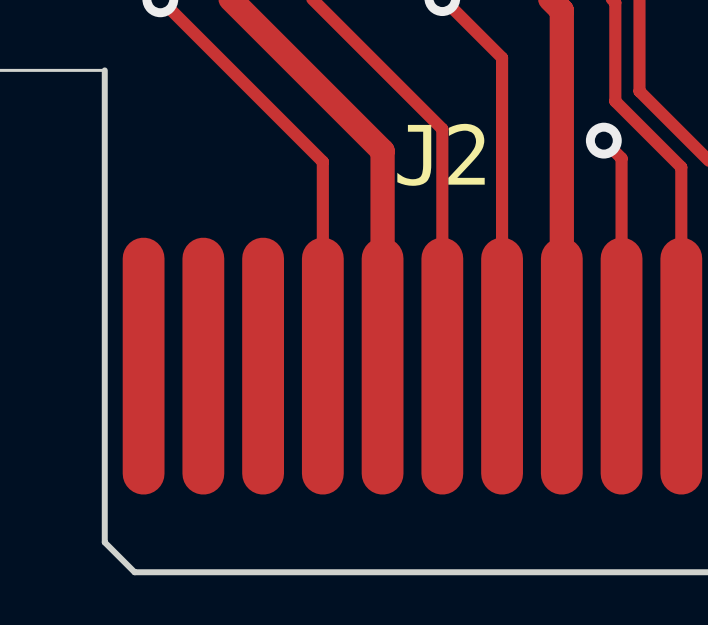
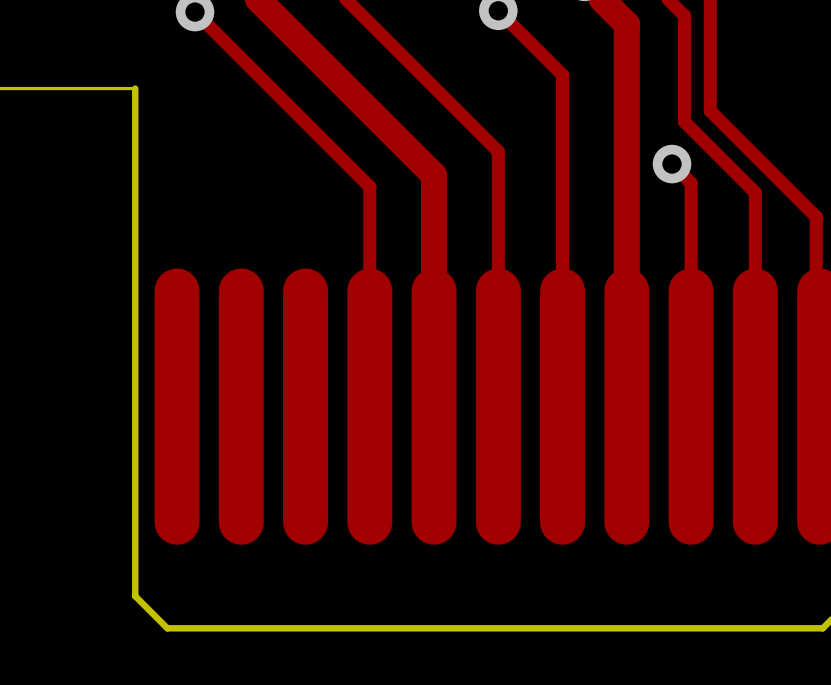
J2 name: J2 (441, 154) -> none

